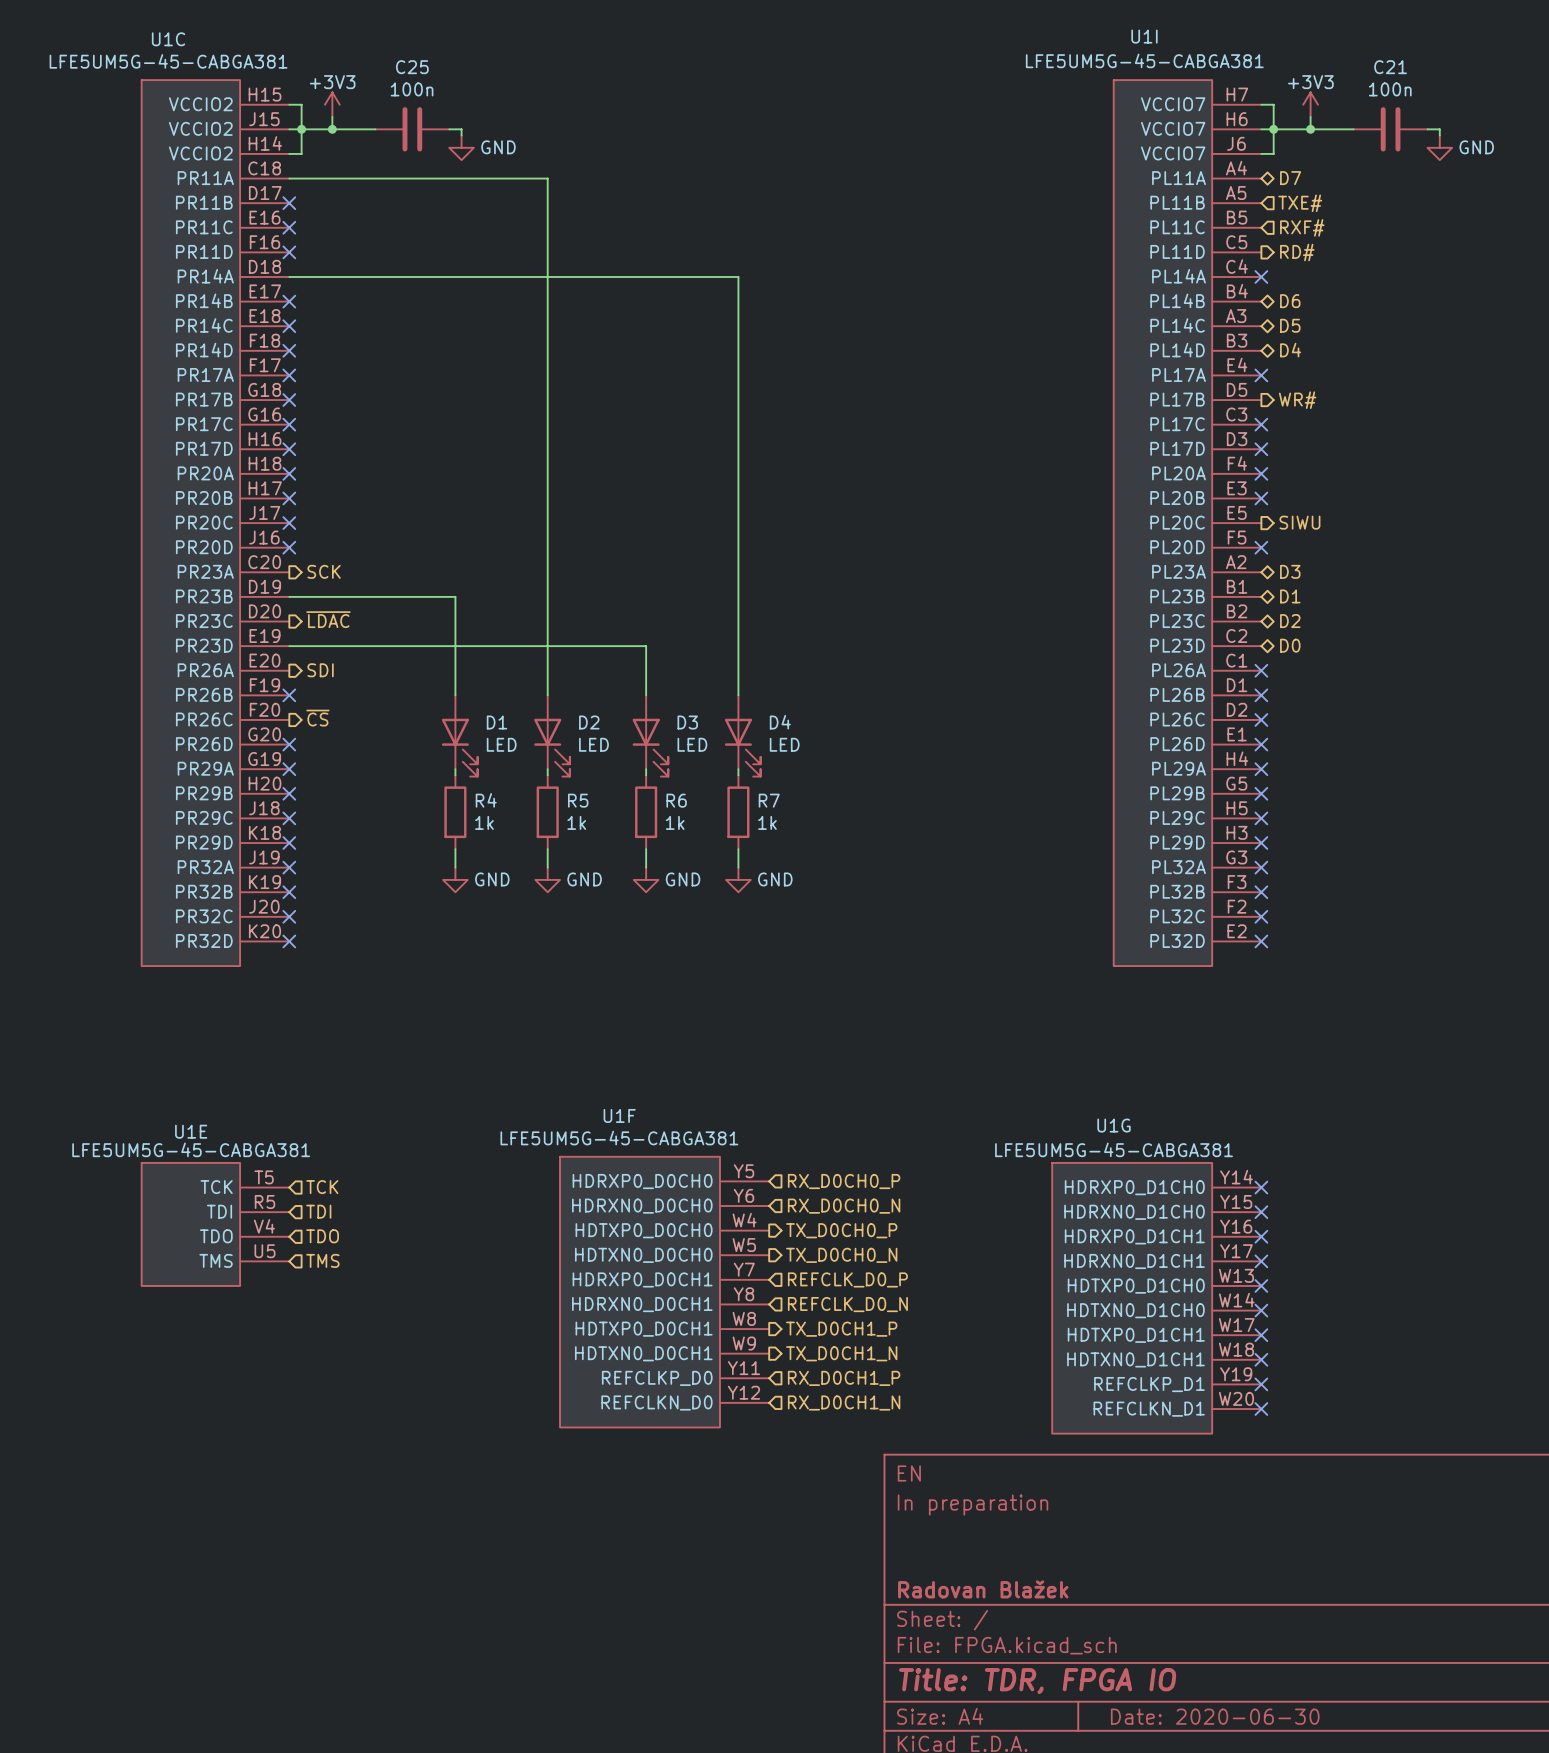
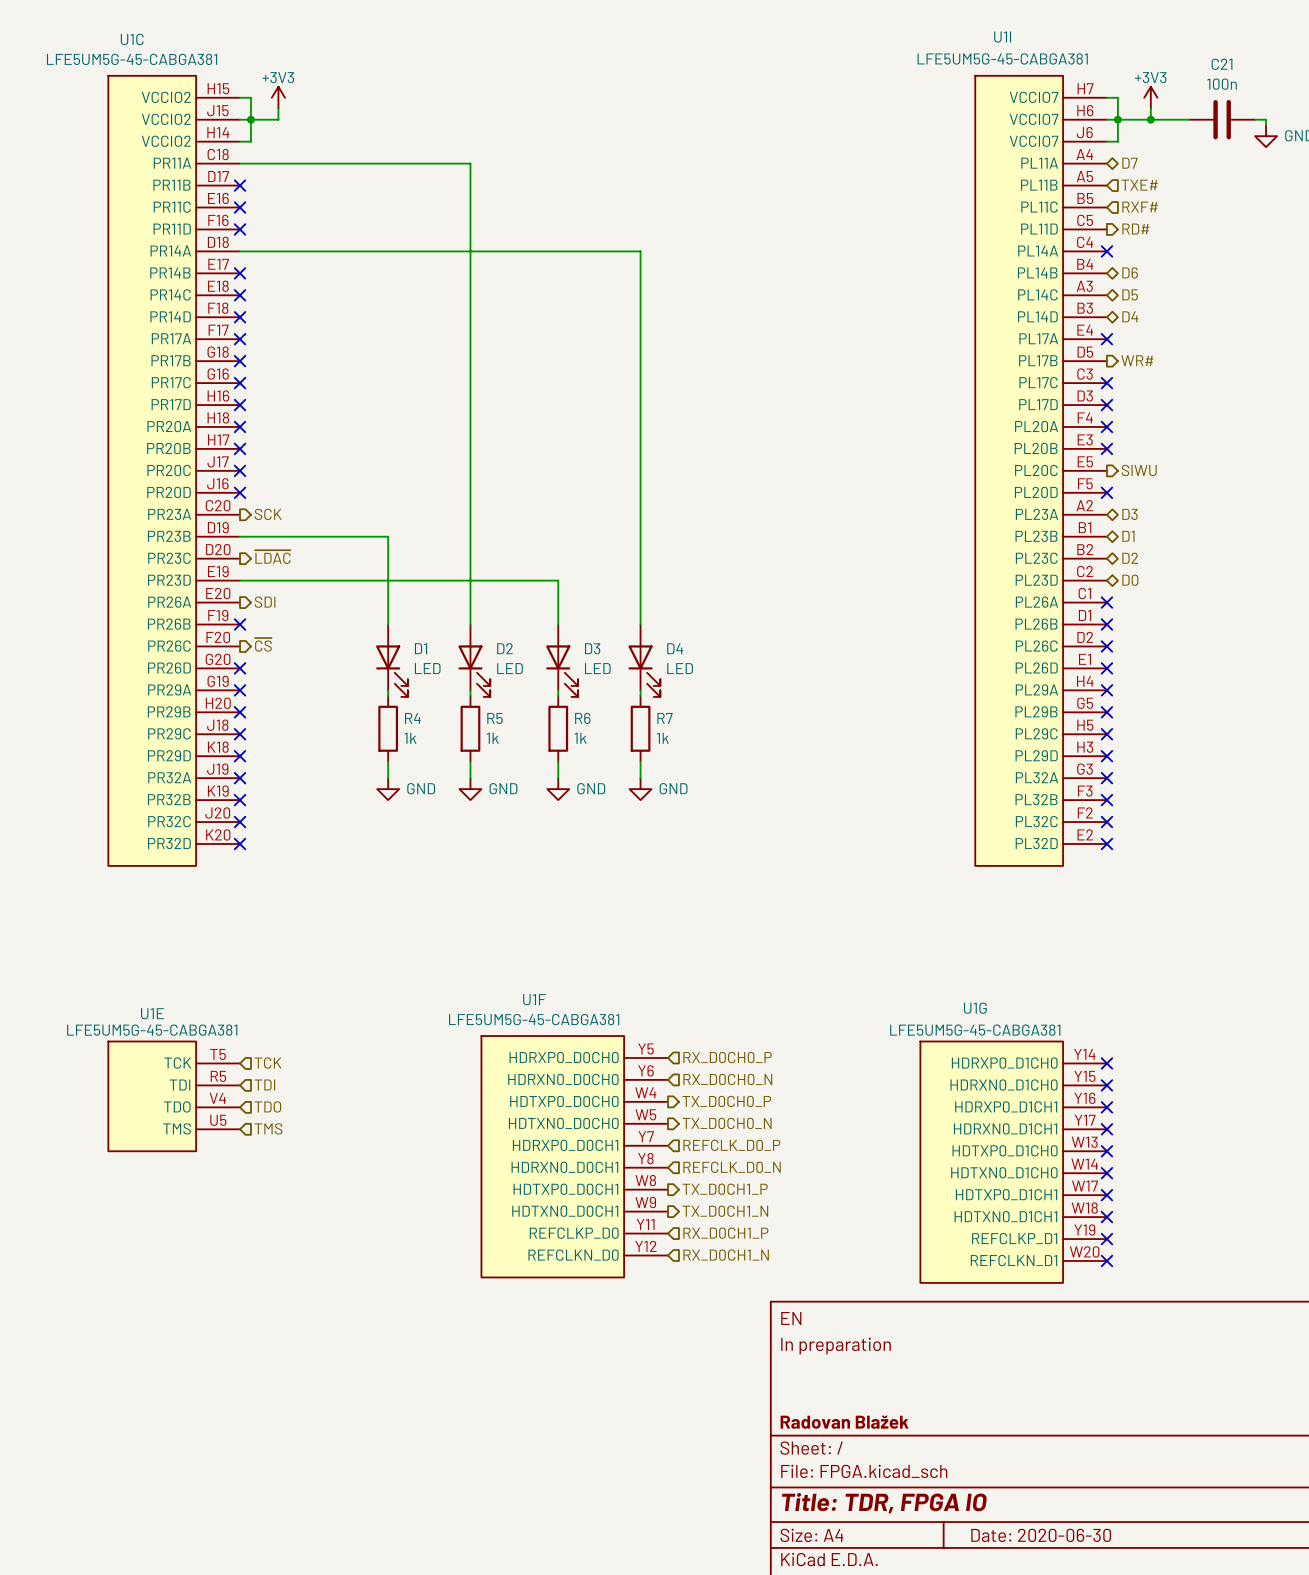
wire: (332, 129) (375, 129) -> none
junction: (332, 129) -> none
C25: 100n (412, 129) -> none
wire: (449, 129) (461, 129) (461, 135) -> none
power symbol: GND (461, 147) -> none

